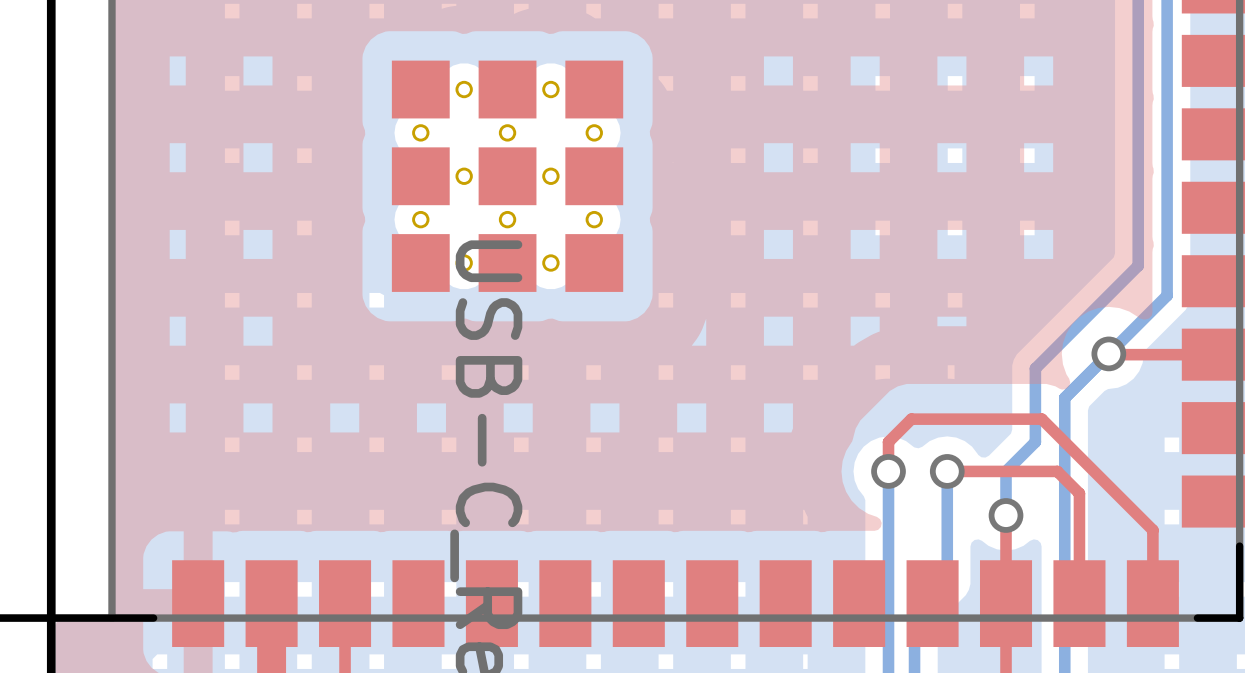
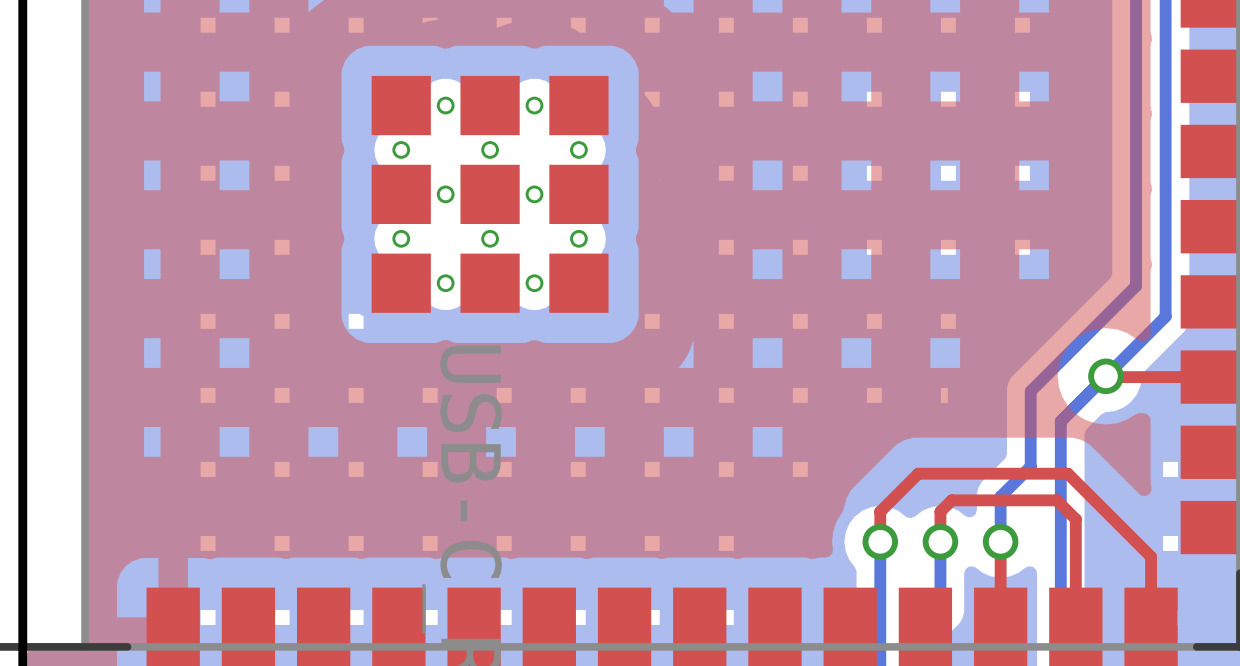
top track: (1071, 448) (1041, 419) (911, 419) (888, 442) (888, 471) -> (1067, 473) (918, 473) (880, 511) (880, 541)
bottom track: (888, 471) (888, 515) -> none
via: (888, 471) -> none
top track: (947, 471) (1057, 471) (1060, 475) -> (940, 541) (940, 511) (951, 500) (1056, 500)
bottom track: (947, 471) (947, 515) -> none
via: (947, 471) -> none
via: none -> (880, 541)
via: none -> (940, 541)

